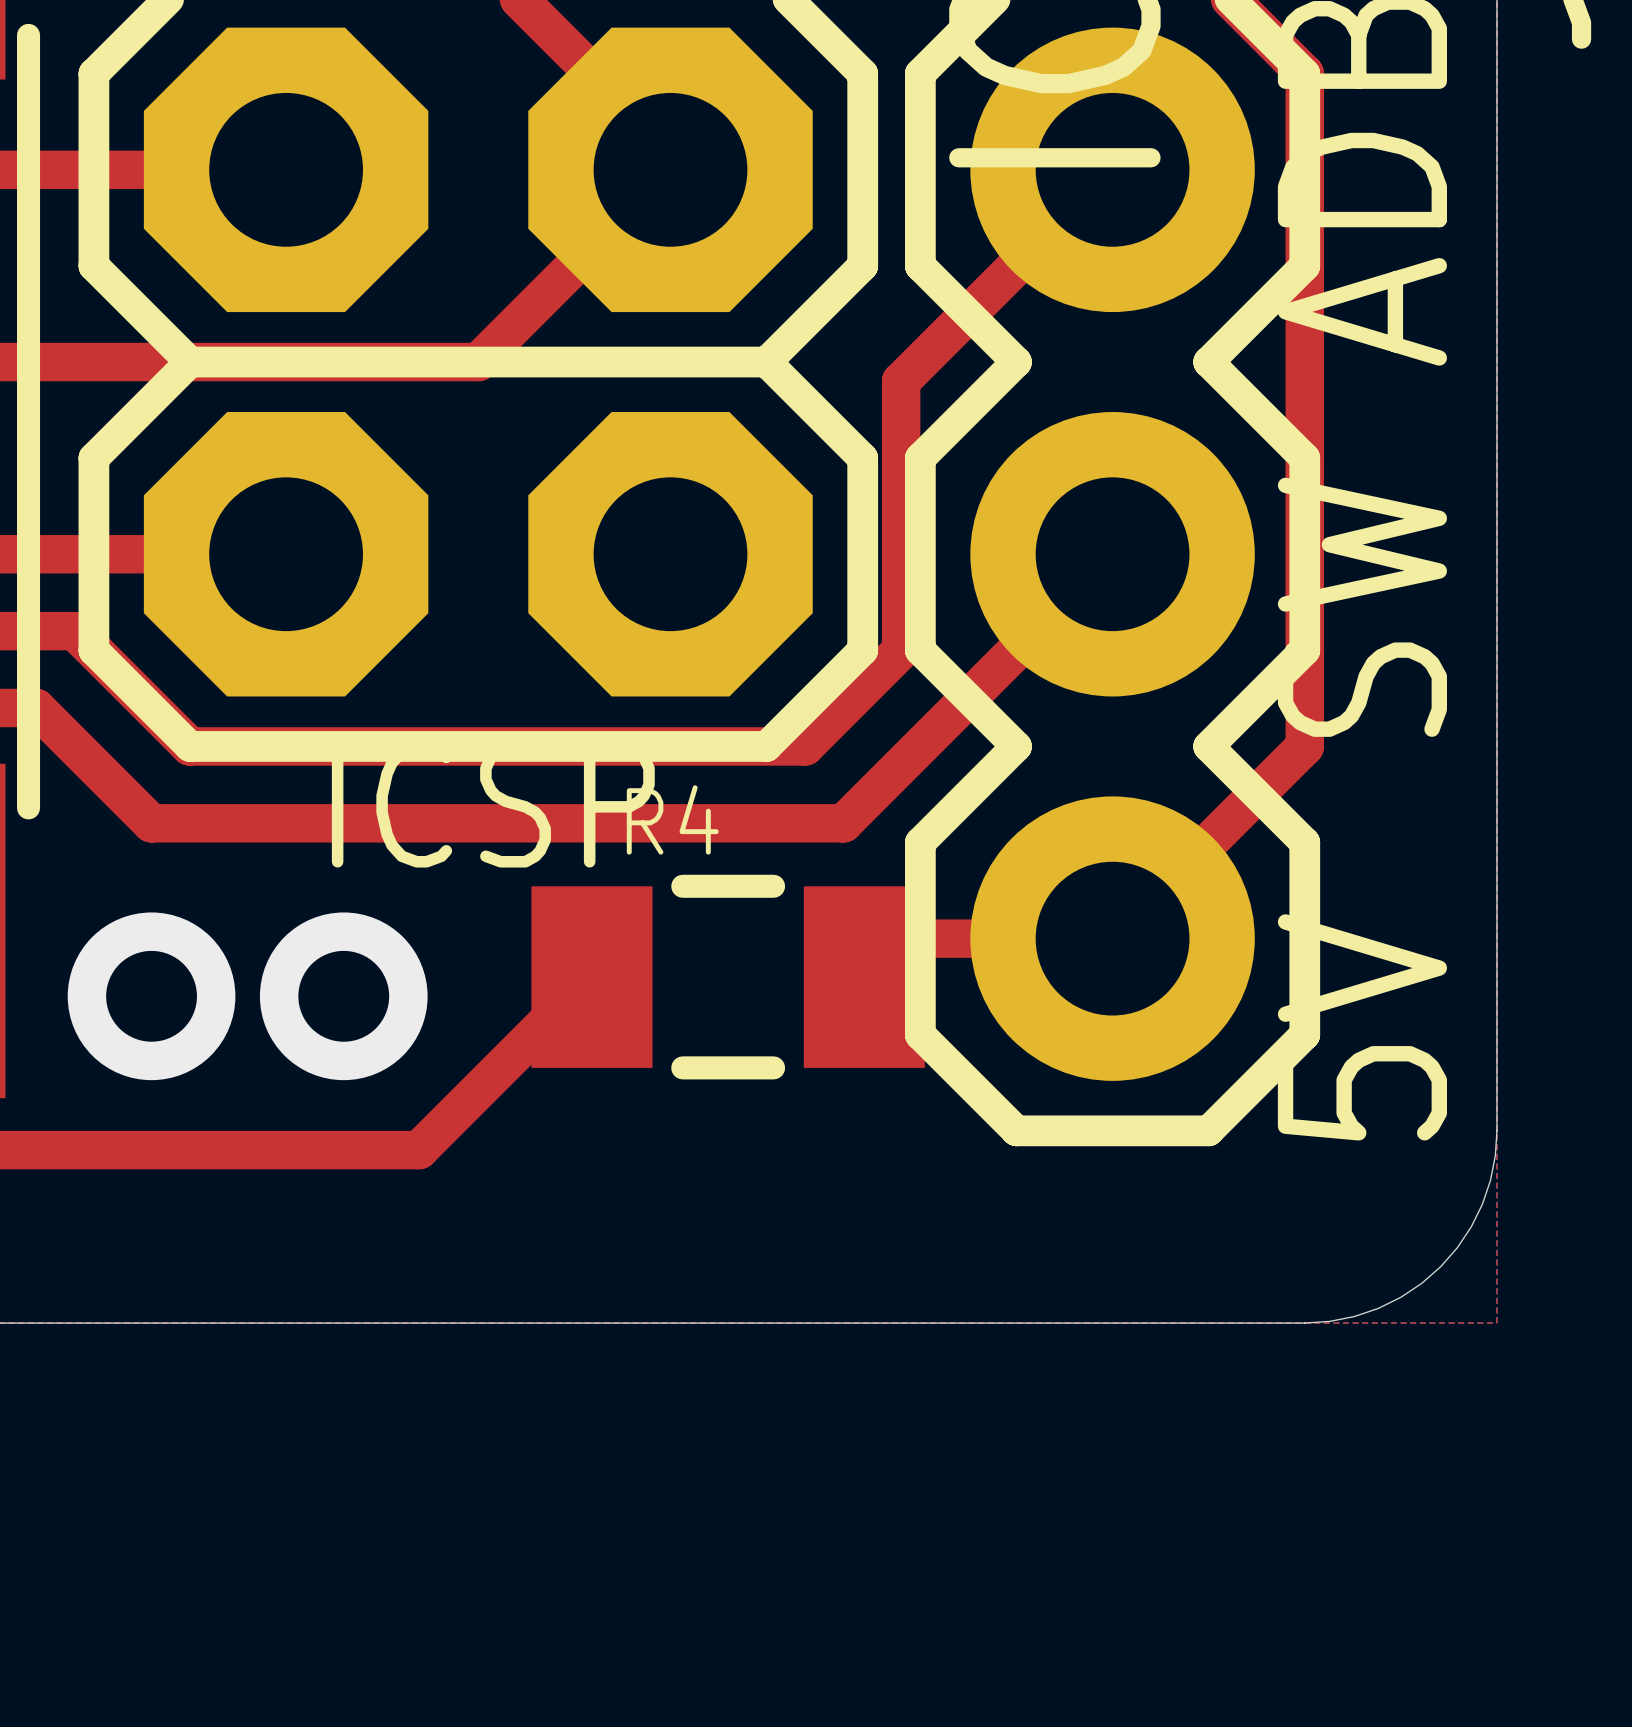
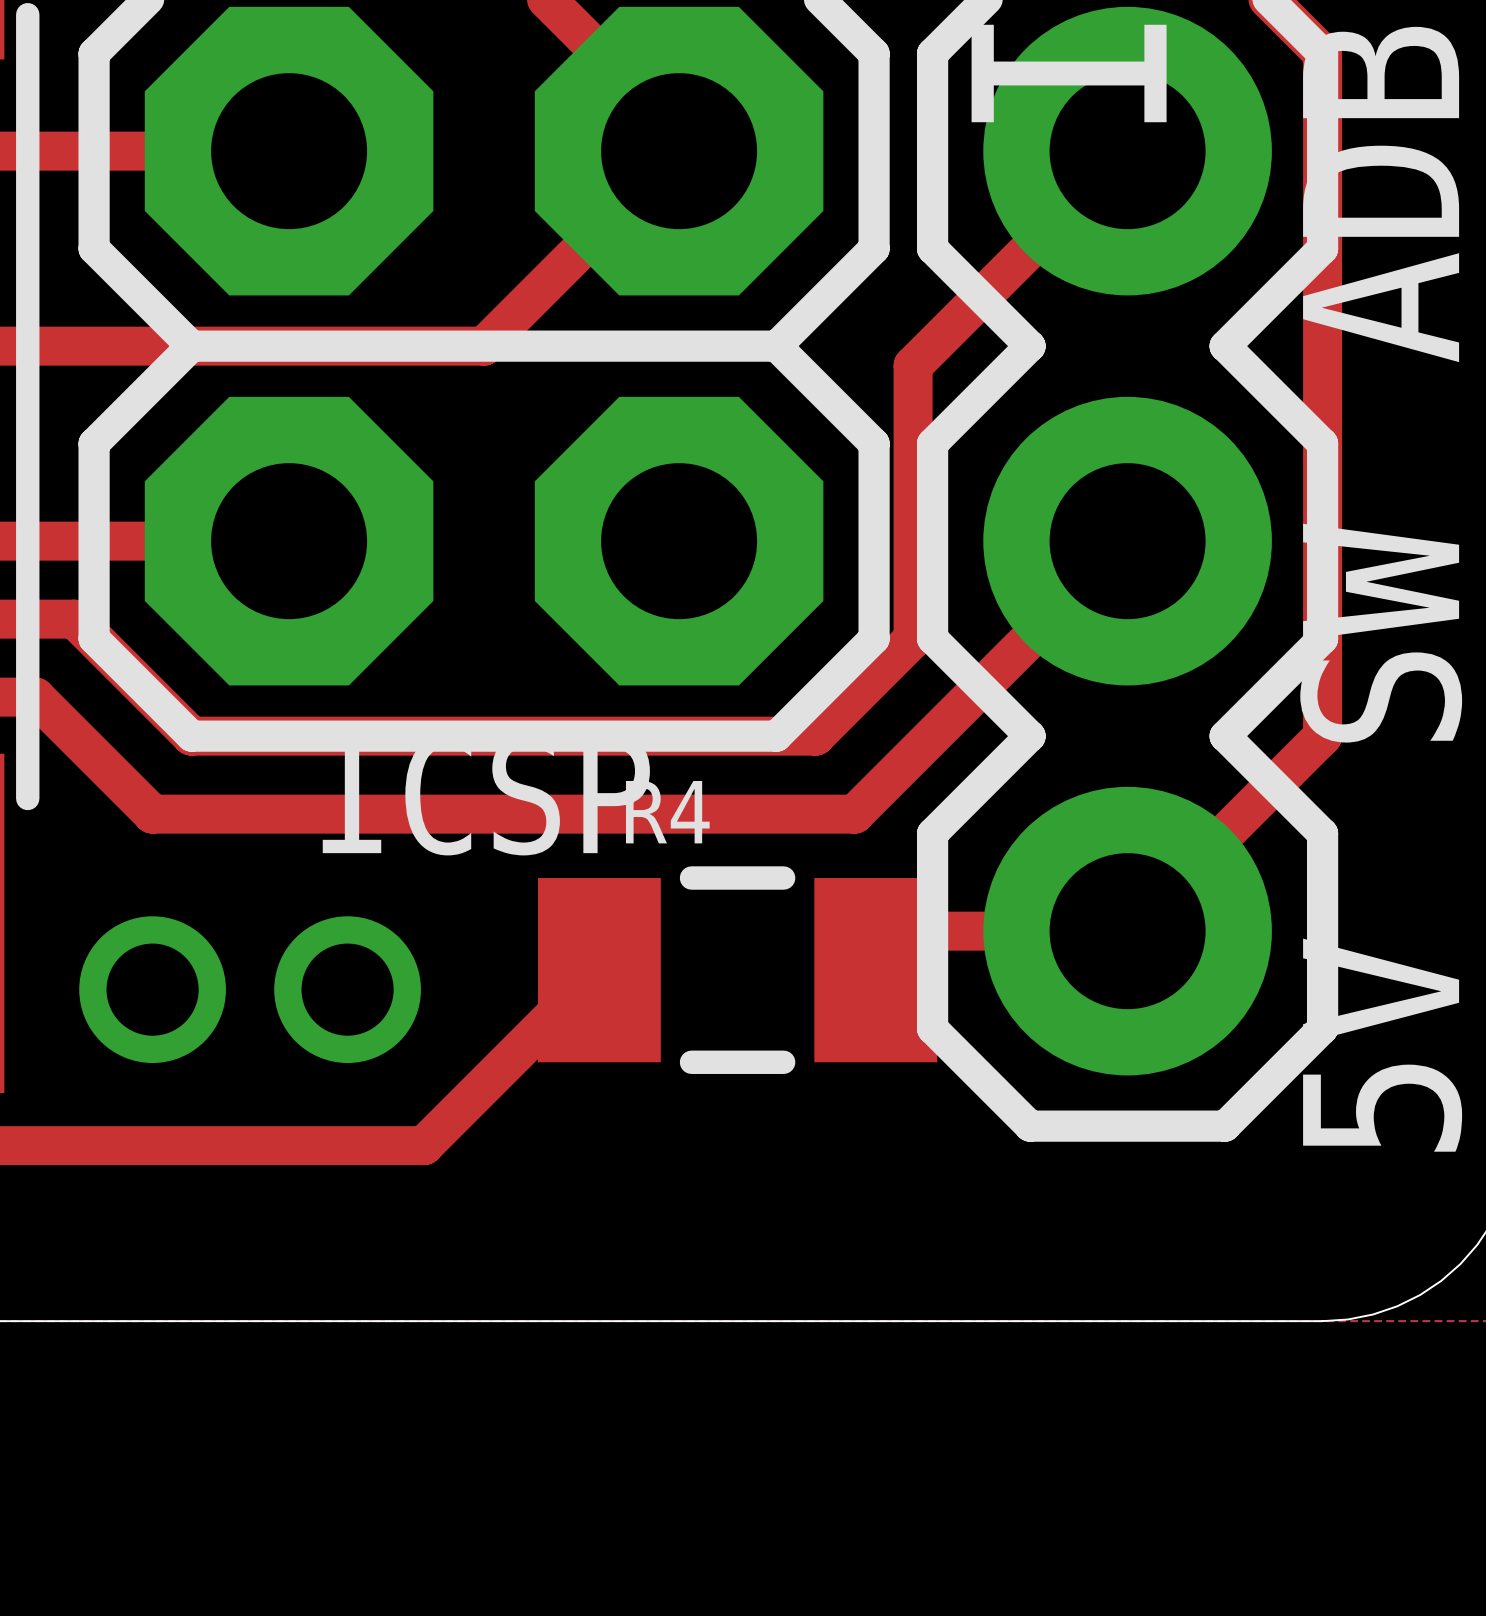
via size: [67, 912, 236, 1081] -> [79, 916, 226, 1064]
via size: [259, 912, 428, 1081] -> [274, 916, 421, 1064]

